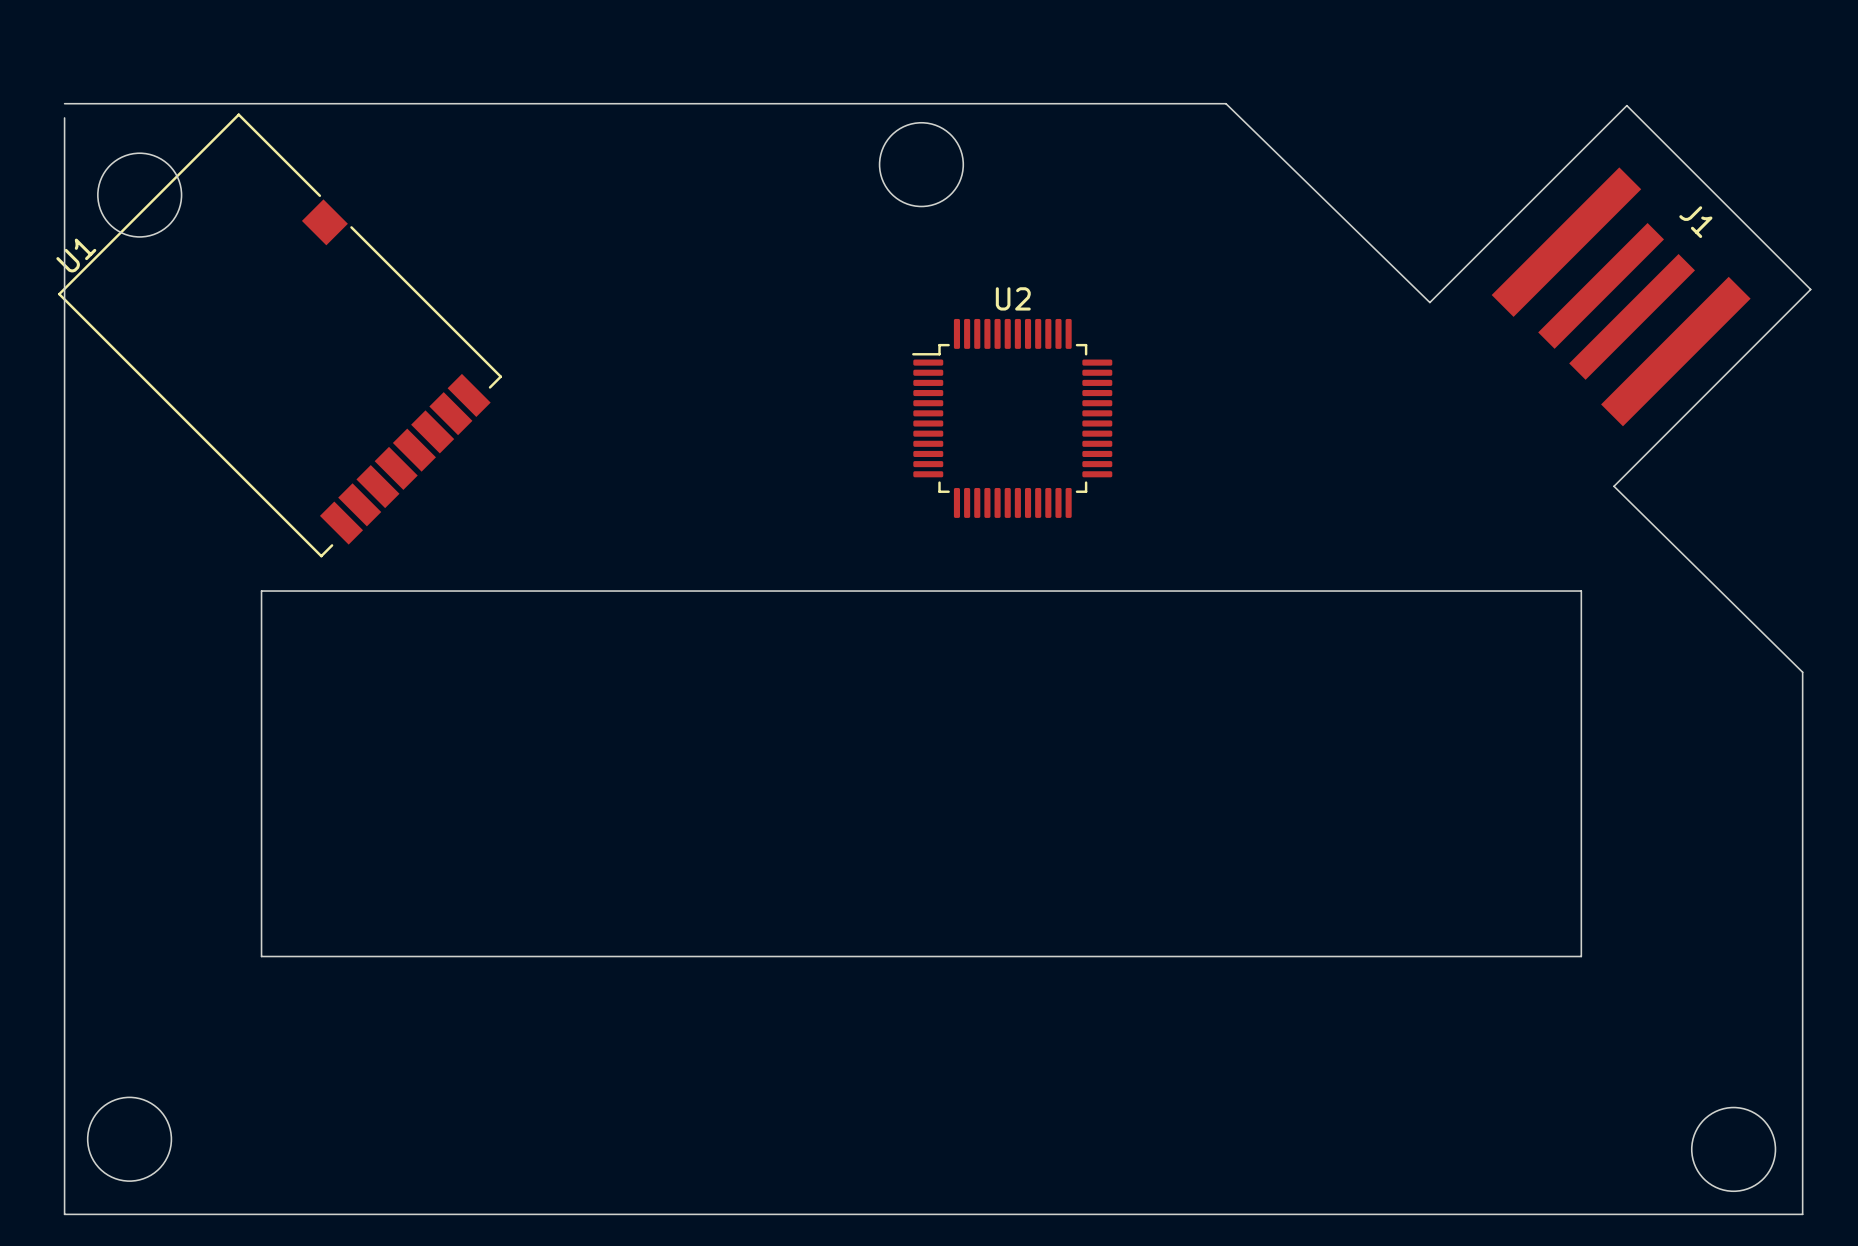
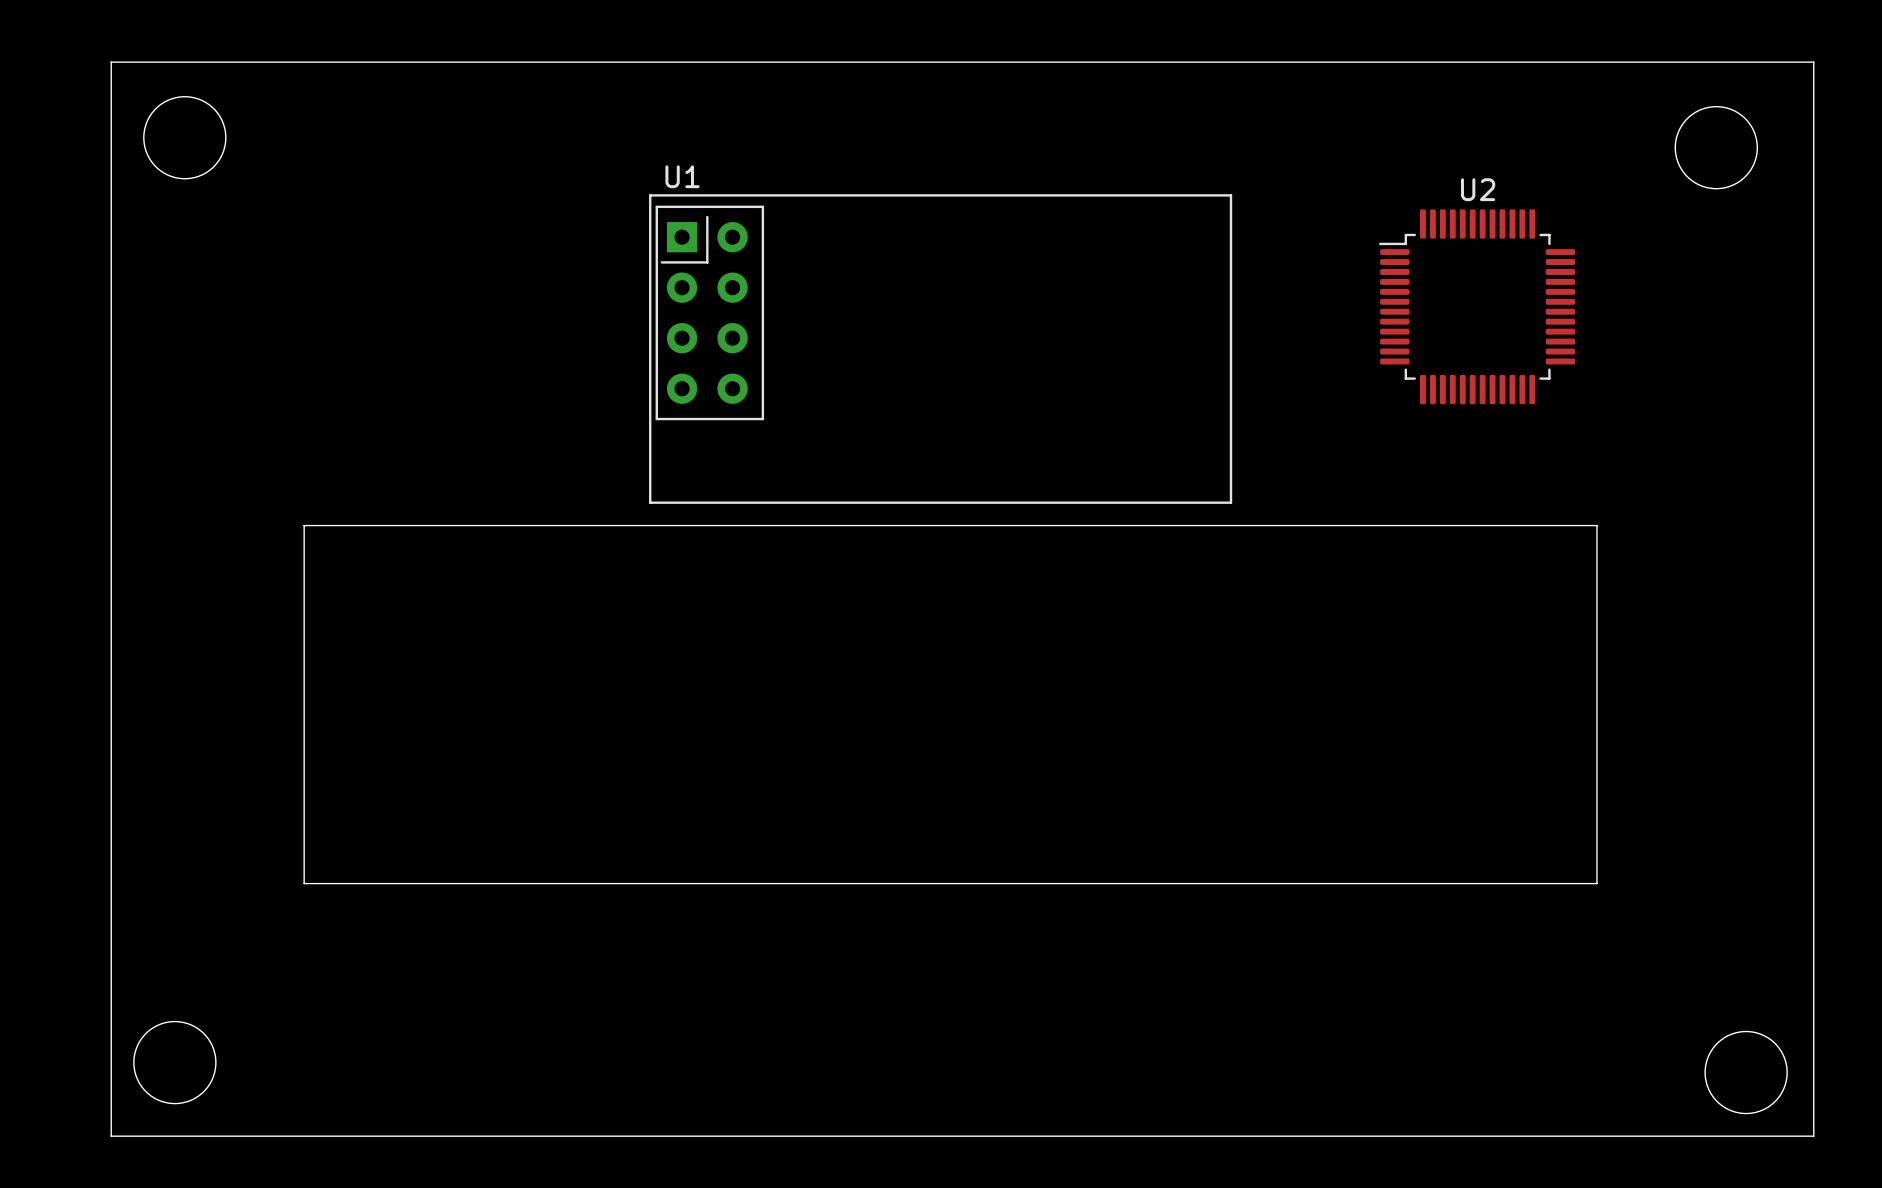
board edge: (64, 103) (1226, 103) (1429, 302) (1626, 105) (1810, 289) (1614, 486) (1802, 672) -> (111, 62) (1813, 62) (1813, 605)
U1 footprint: [58, 113, 503, 558] -> [649, 194, 1233, 504]
round board edge: [879, 122, 964, 207] -> none
round board edge: none -> [1674, 106, 1758, 190]
U1 name position: U1 (76, 255) -> U1 (682, 176)
J1: (1621, 296) -> none
U2 position: (1012, 418) -> (1477, 306)

